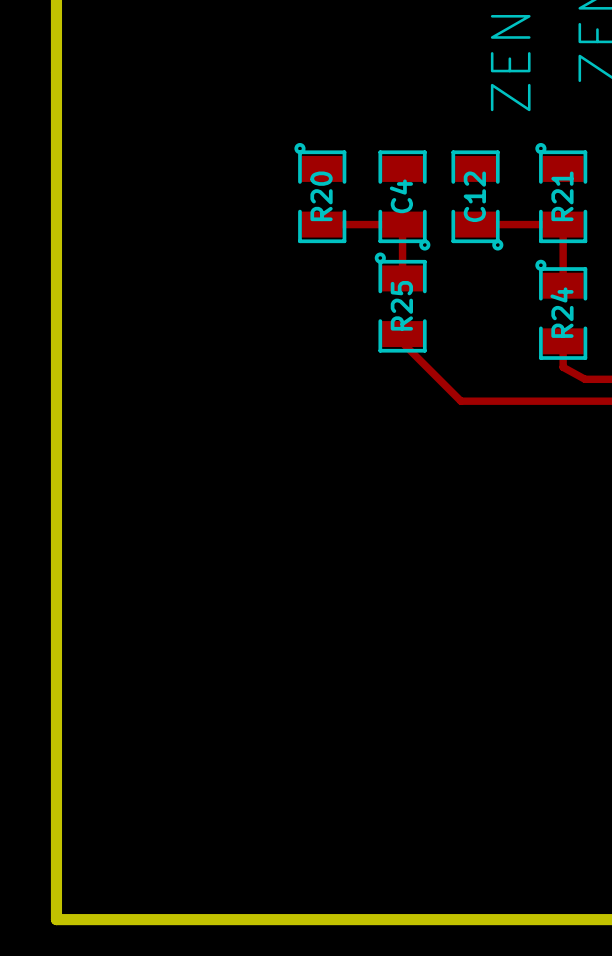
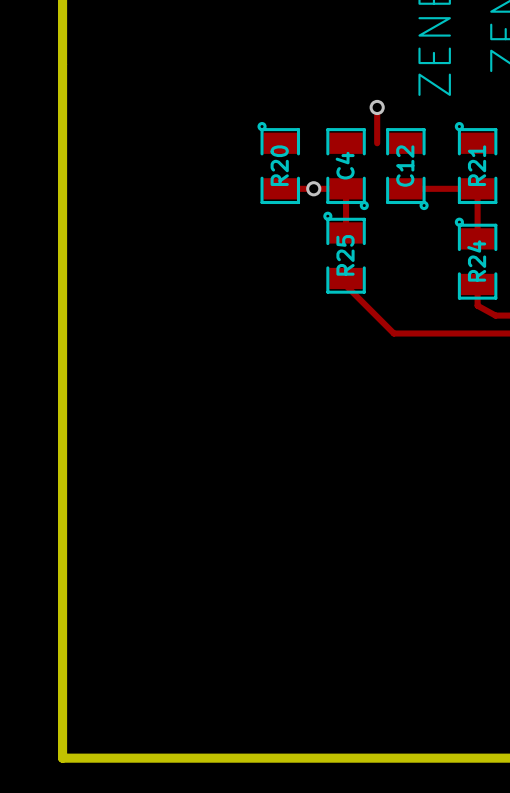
track: none -> (377, 107) (377, 143)
via: none -> (377, 107)
via: none -> (313, 188)

